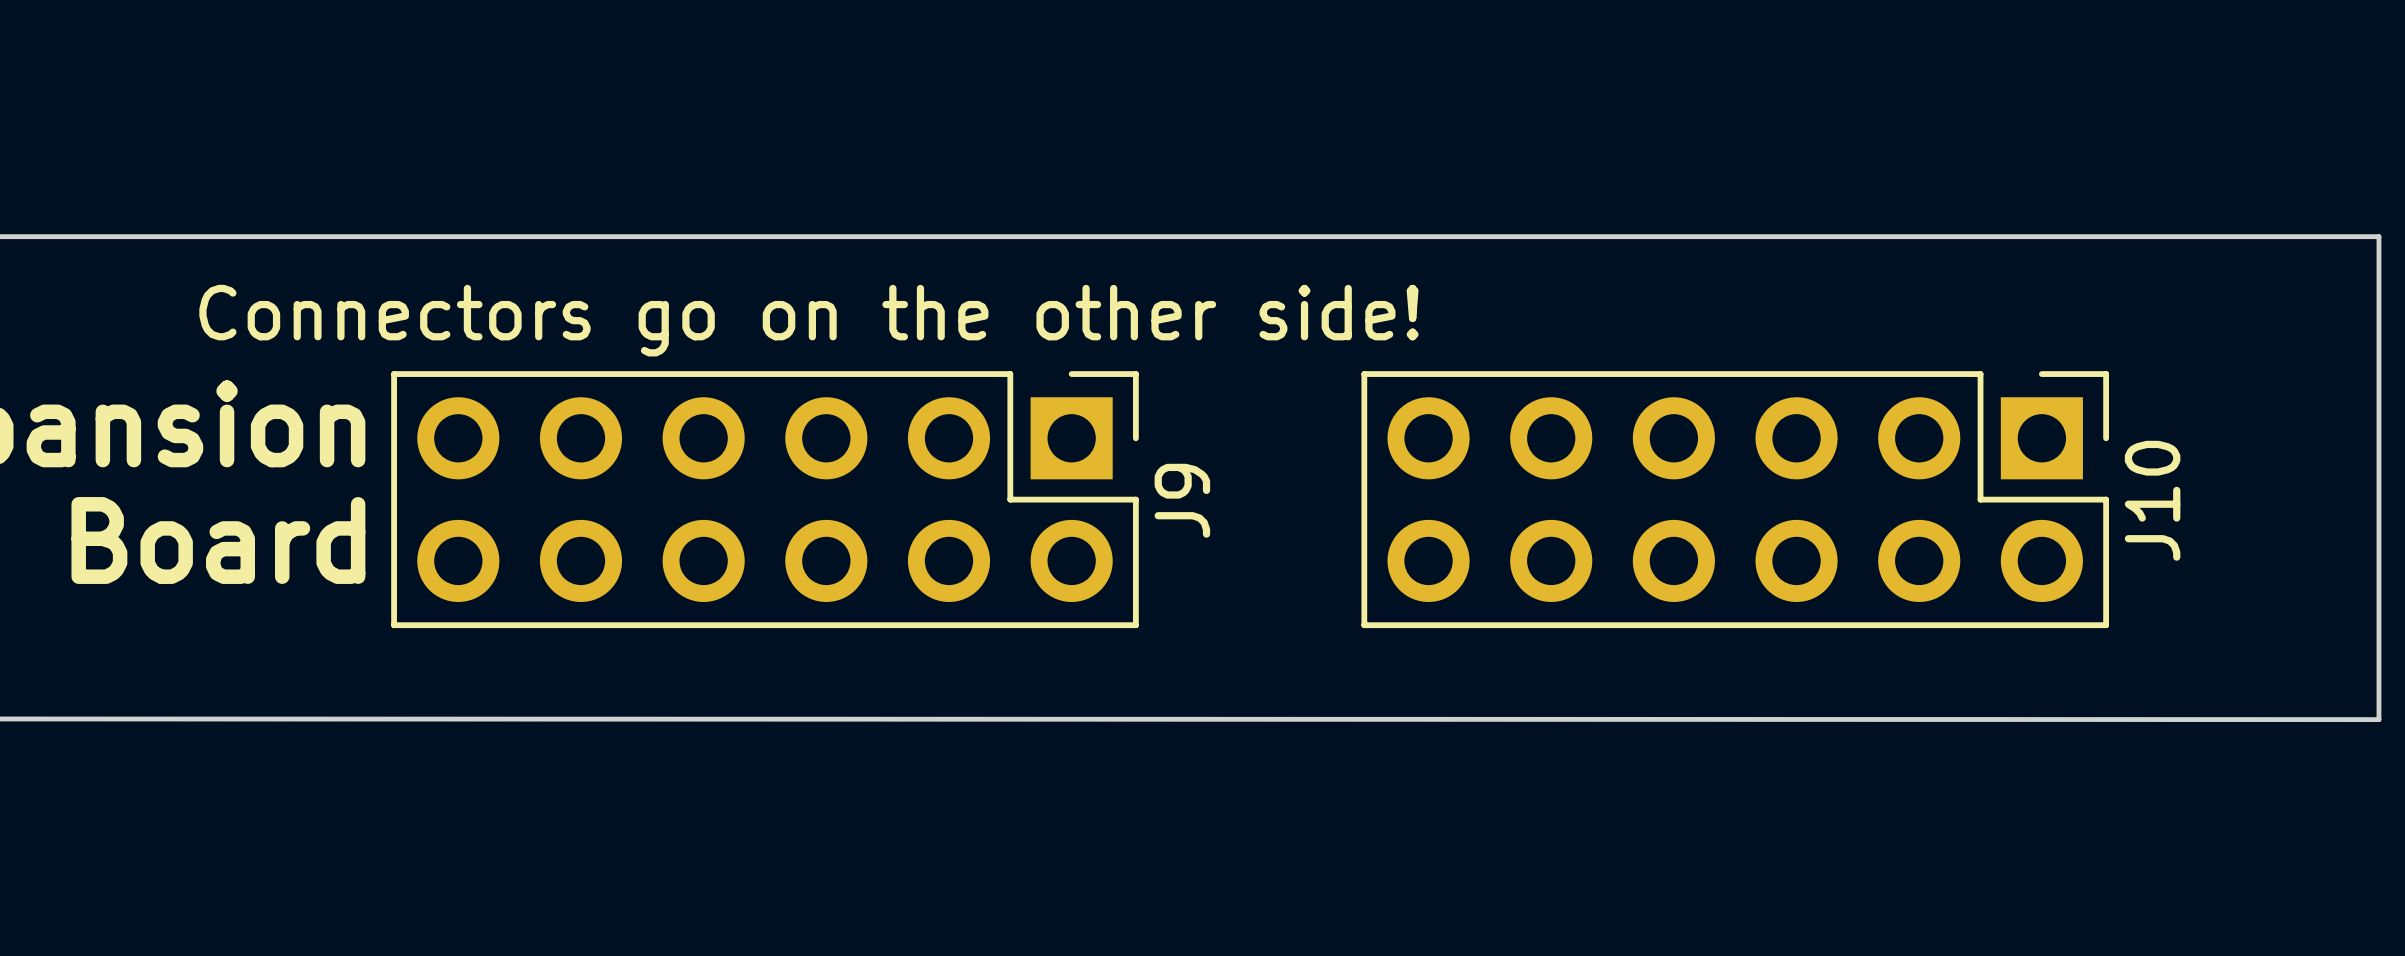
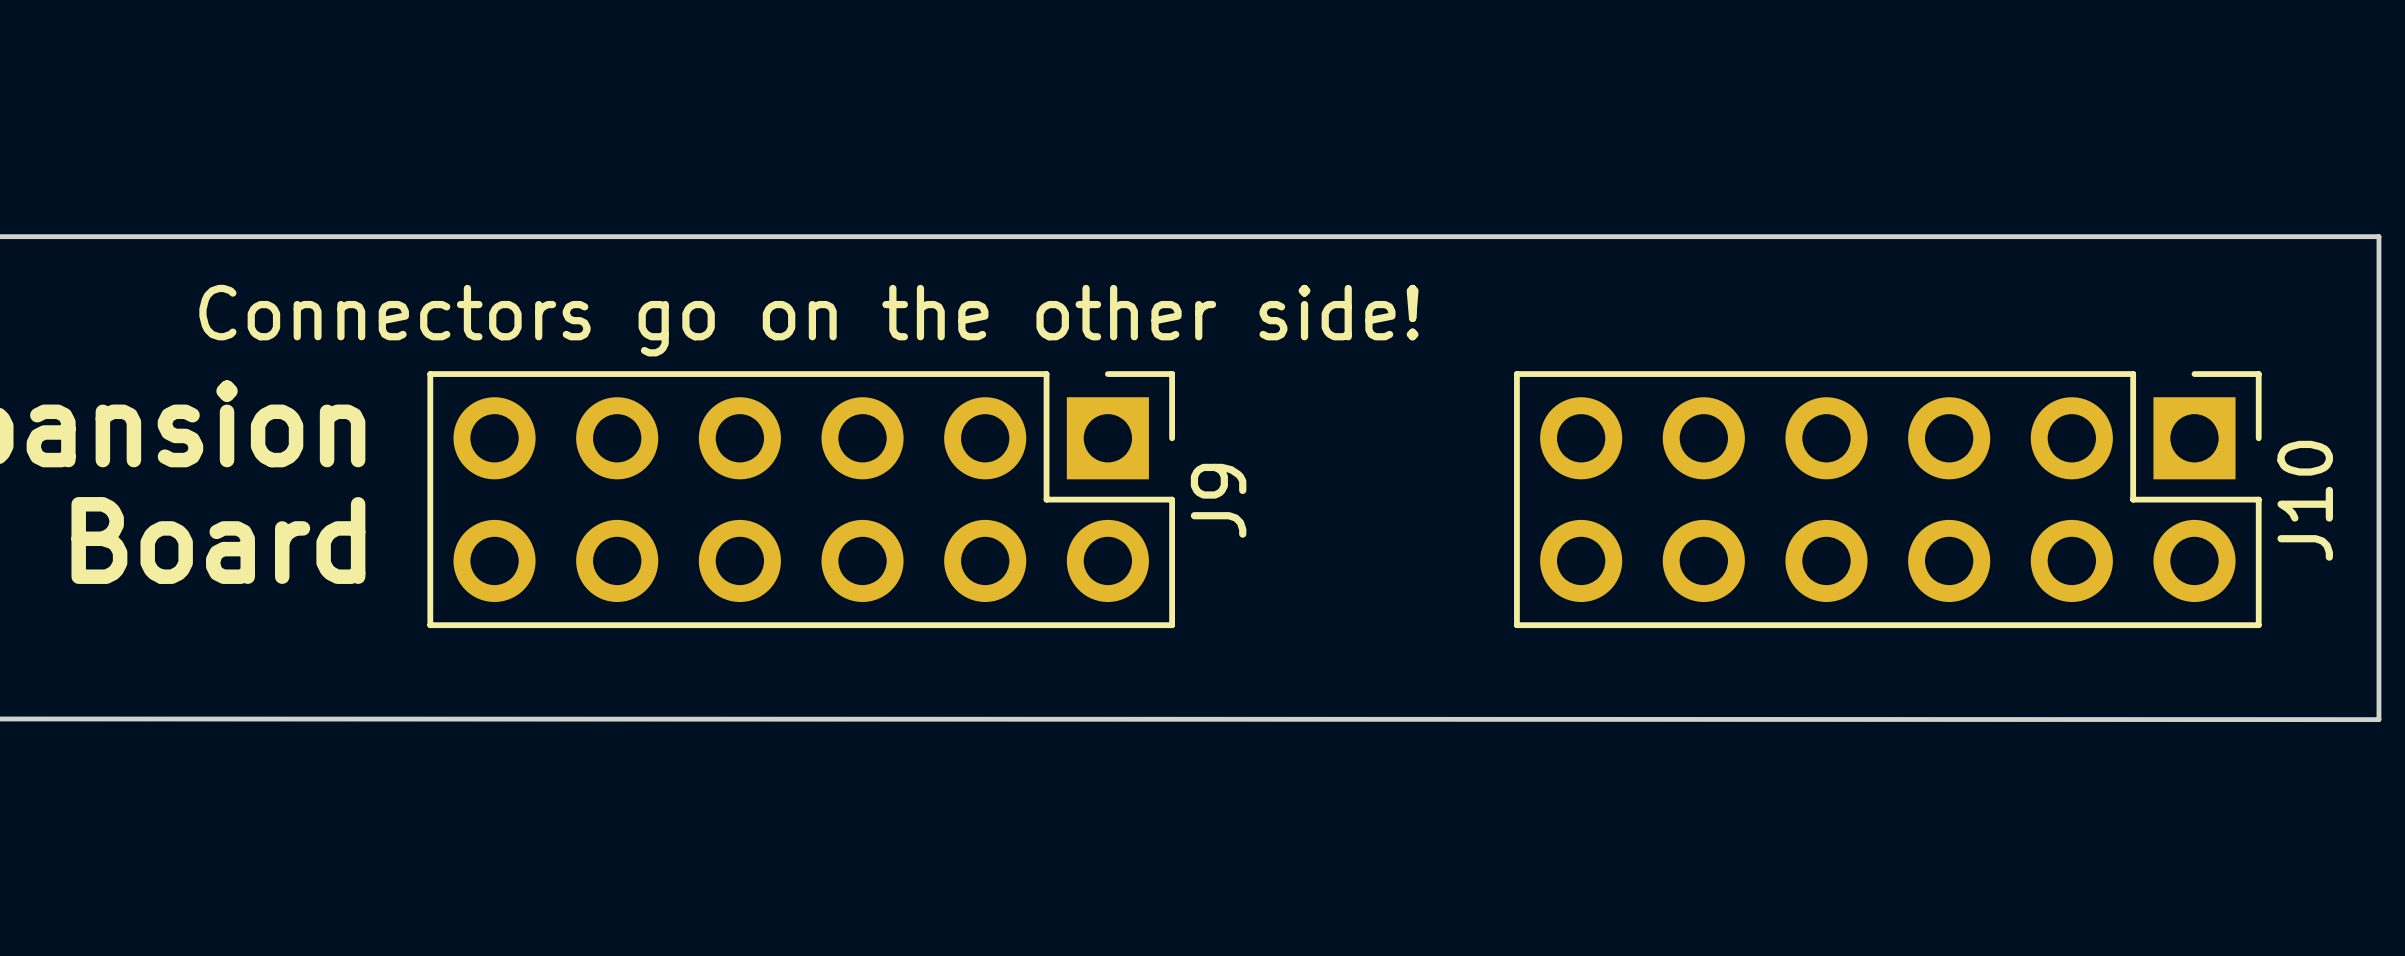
J9 position: (764, 499) -> (801, 499)
J10 position: (1735, 499) -> (1887, 499)

